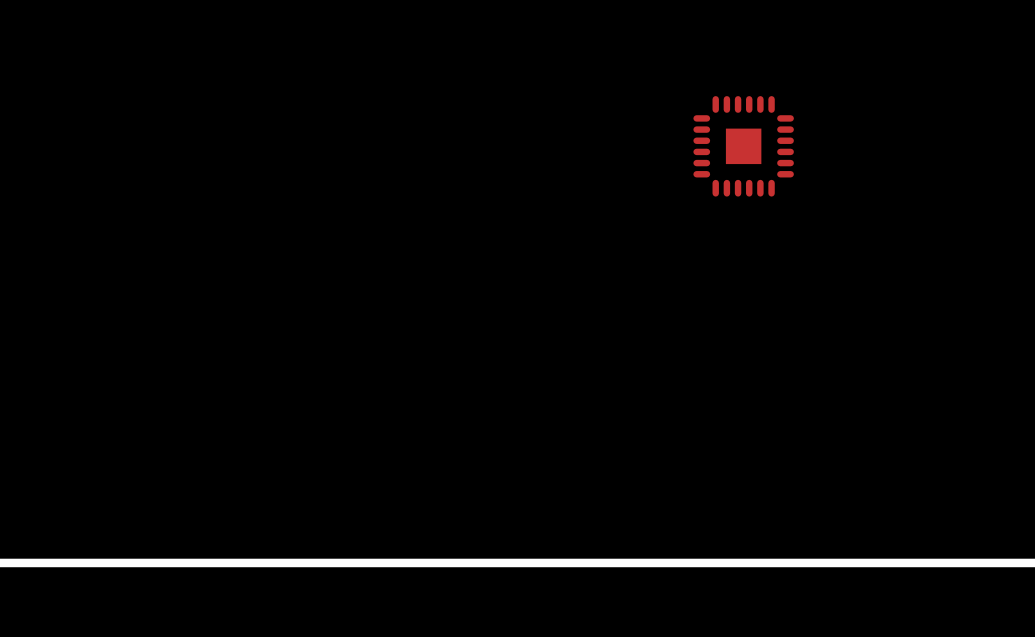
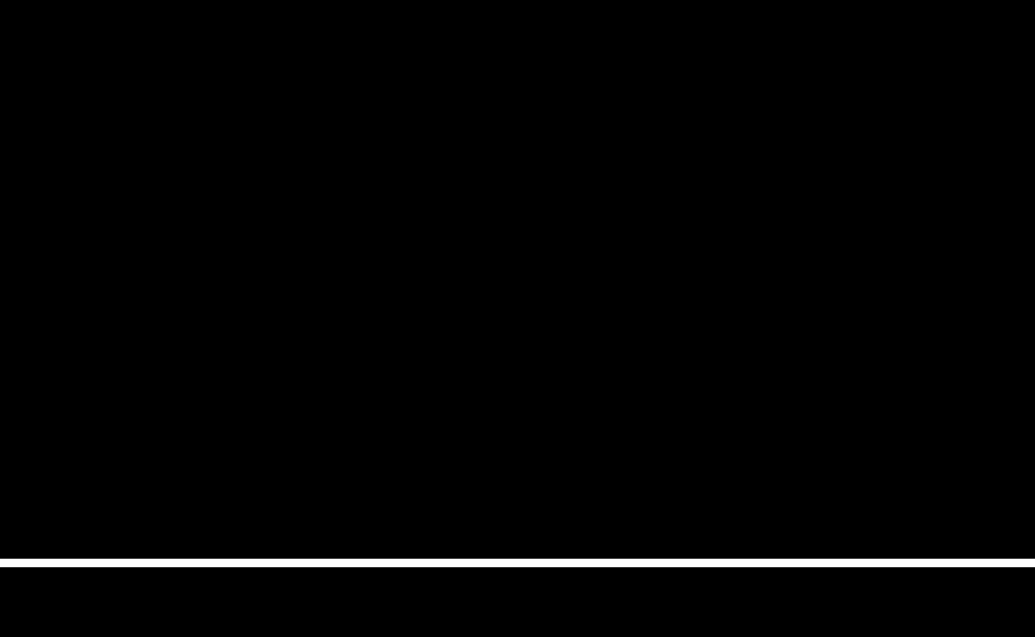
part: (743, 146) -> none

